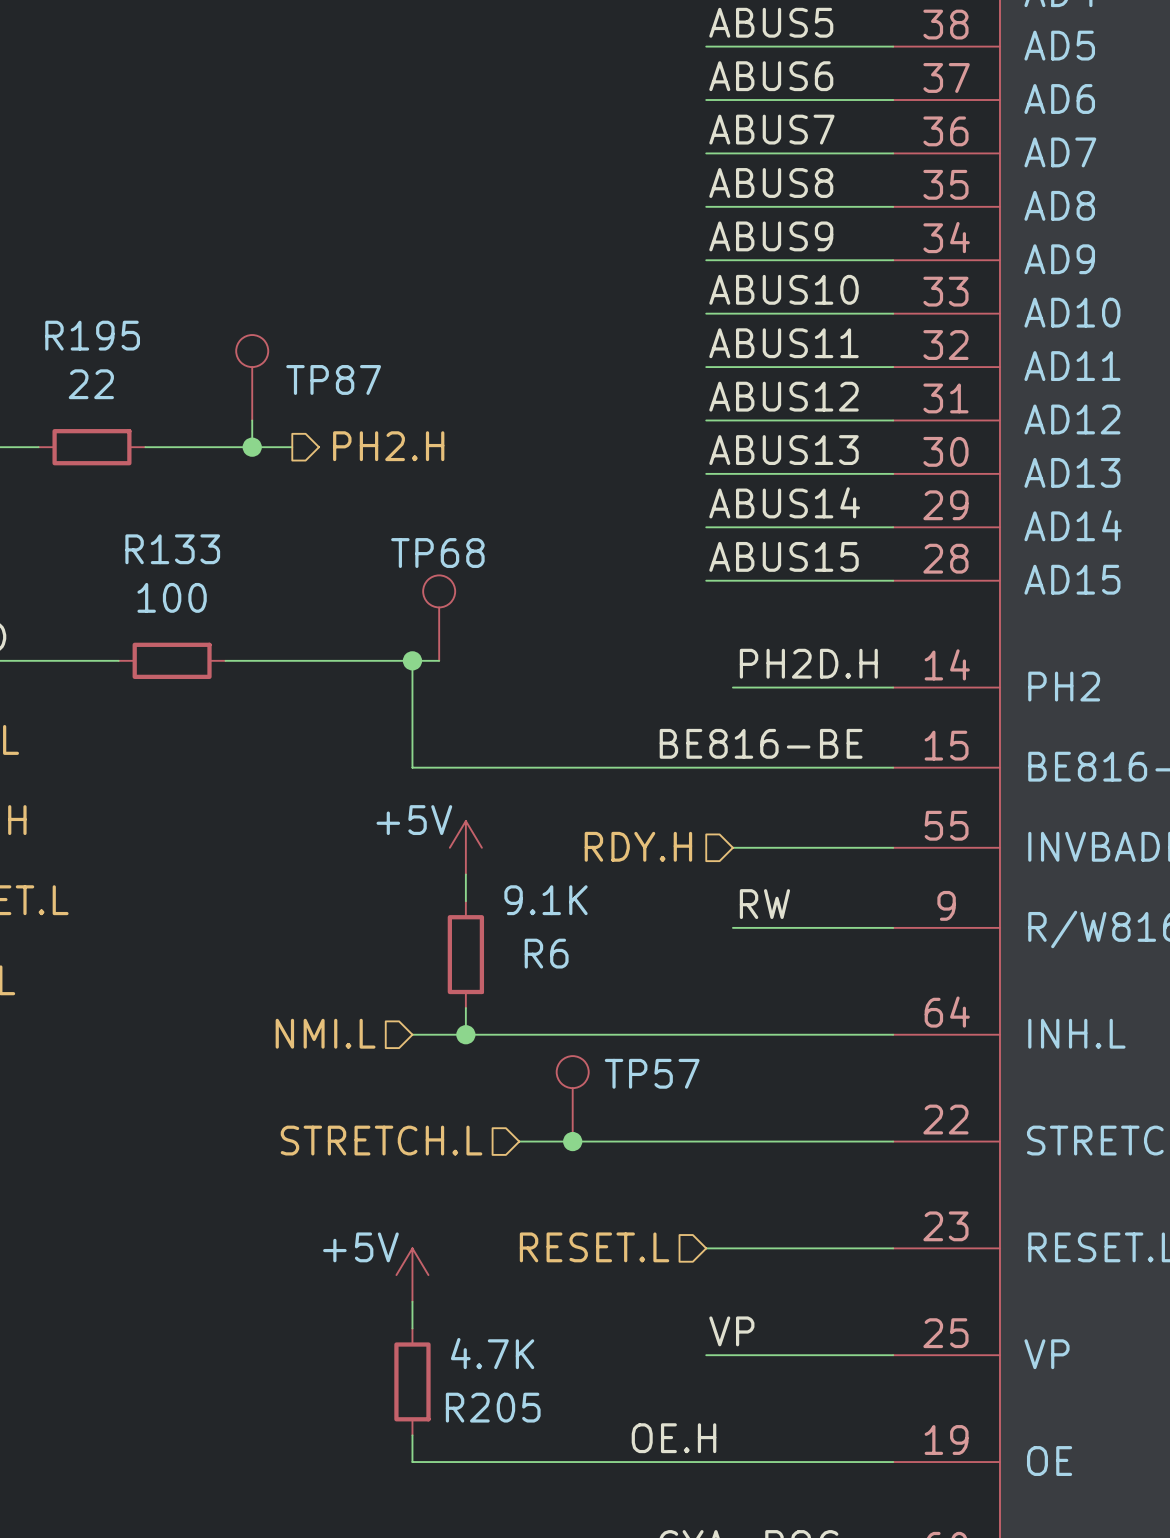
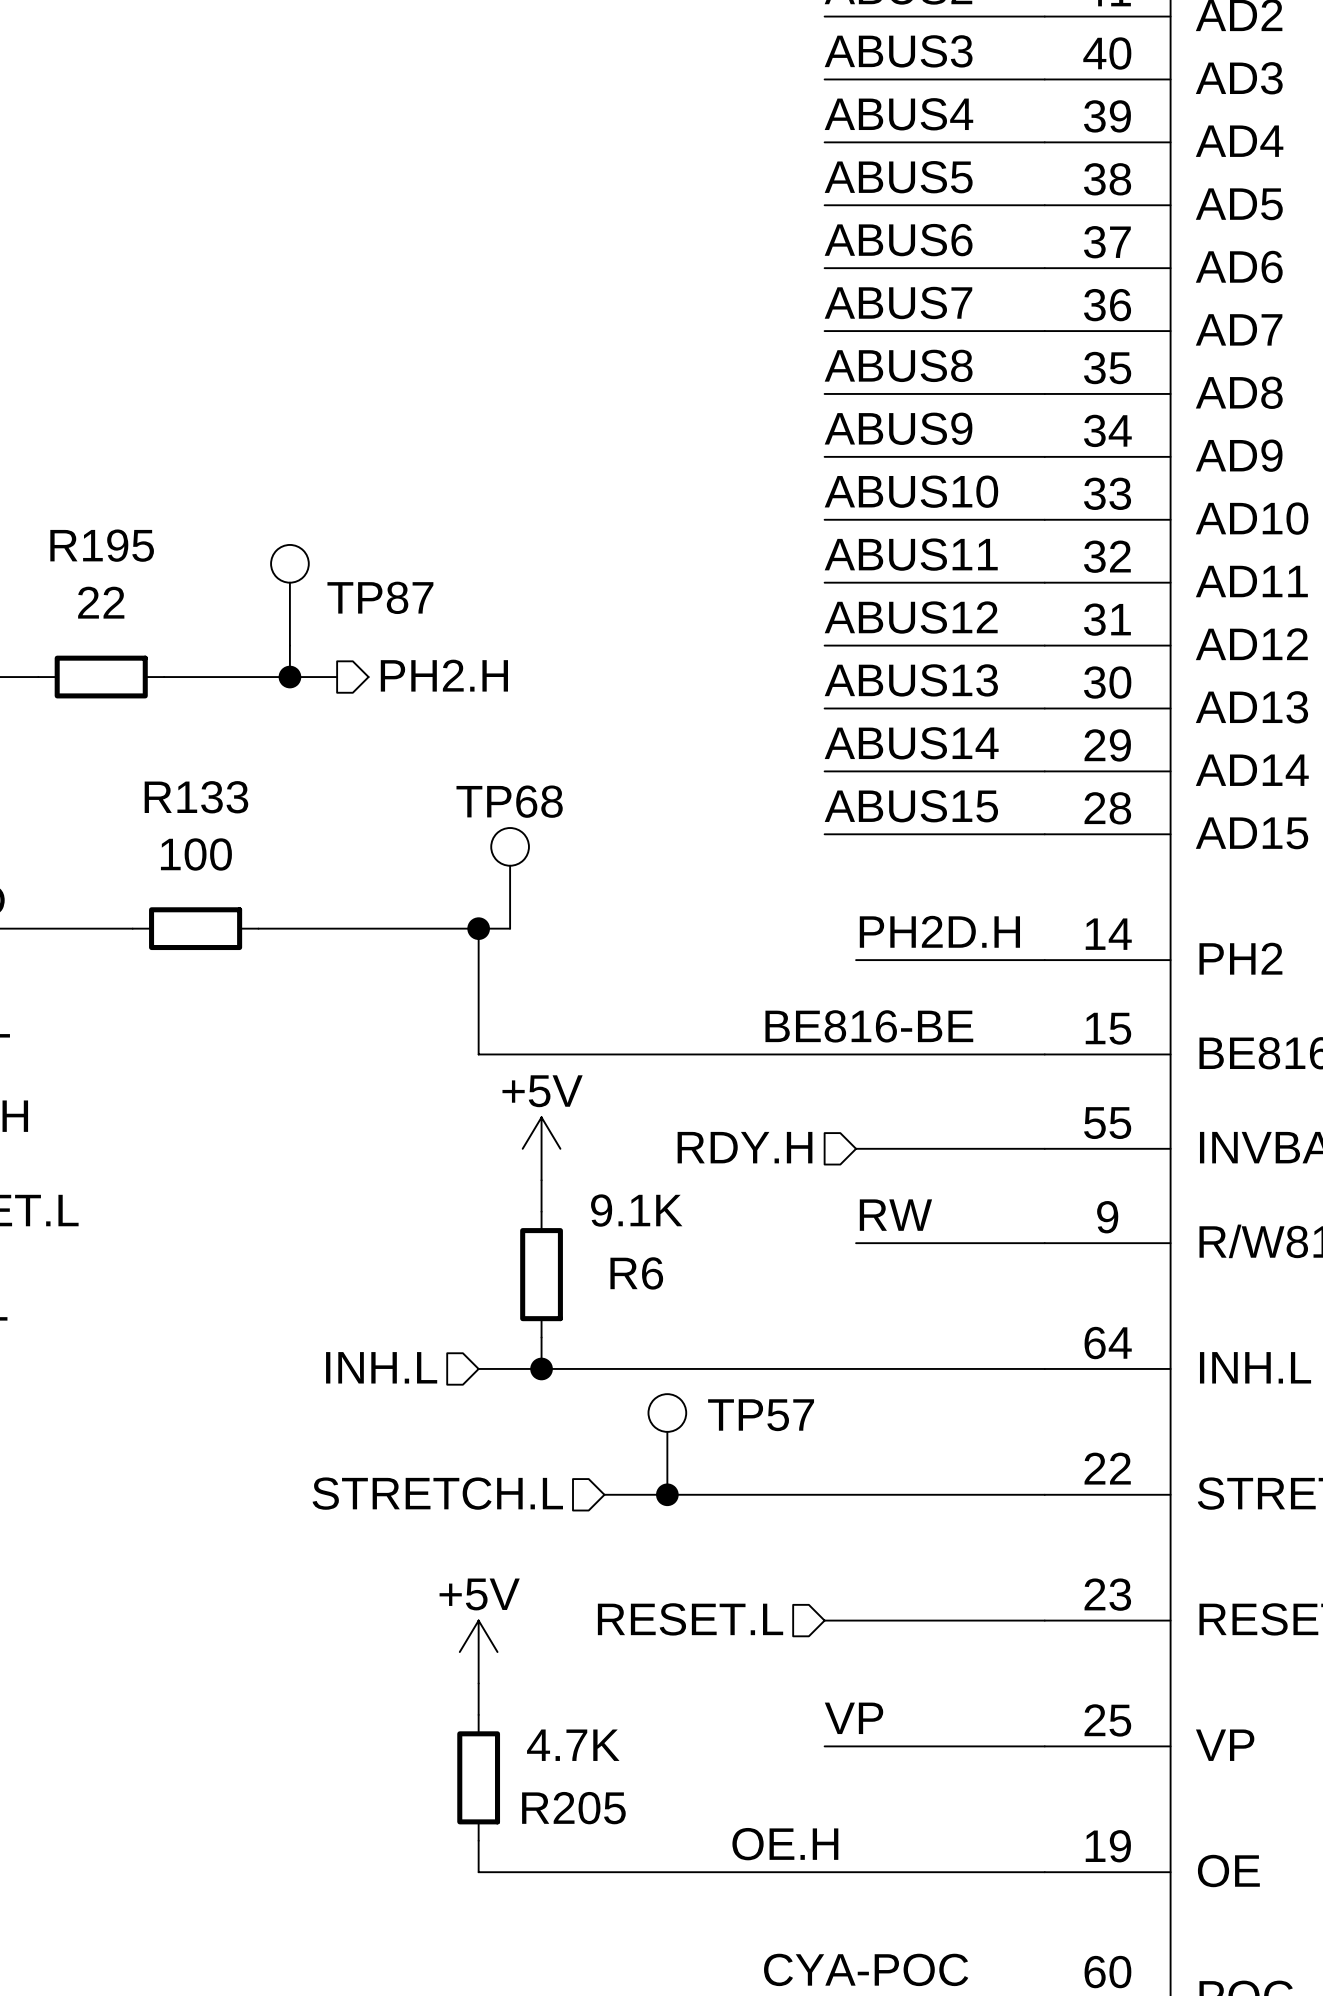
power symbol text position: +5V (414, 820) -> +5V (542, 1091)
hierarchical label: NMI.L (325, 1033) -> INH.L (381, 1367)
power symbol text position: +5V (360, 1247) -> +5V (479, 1594)

